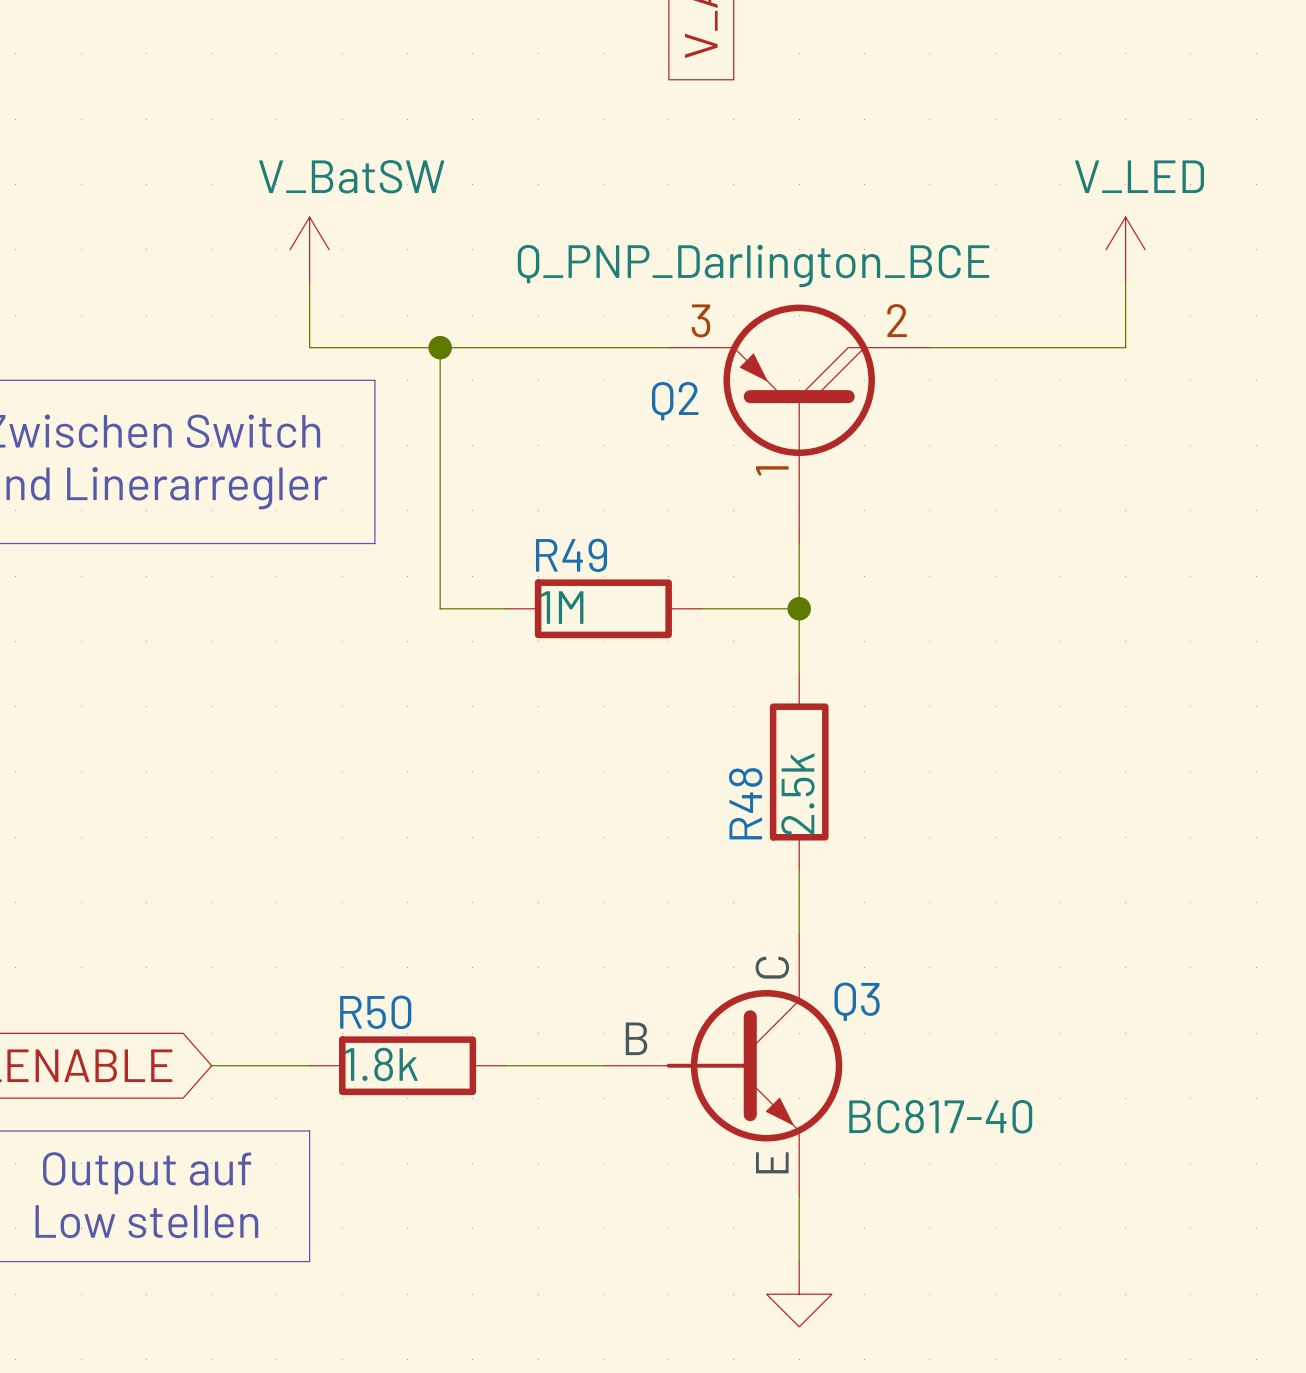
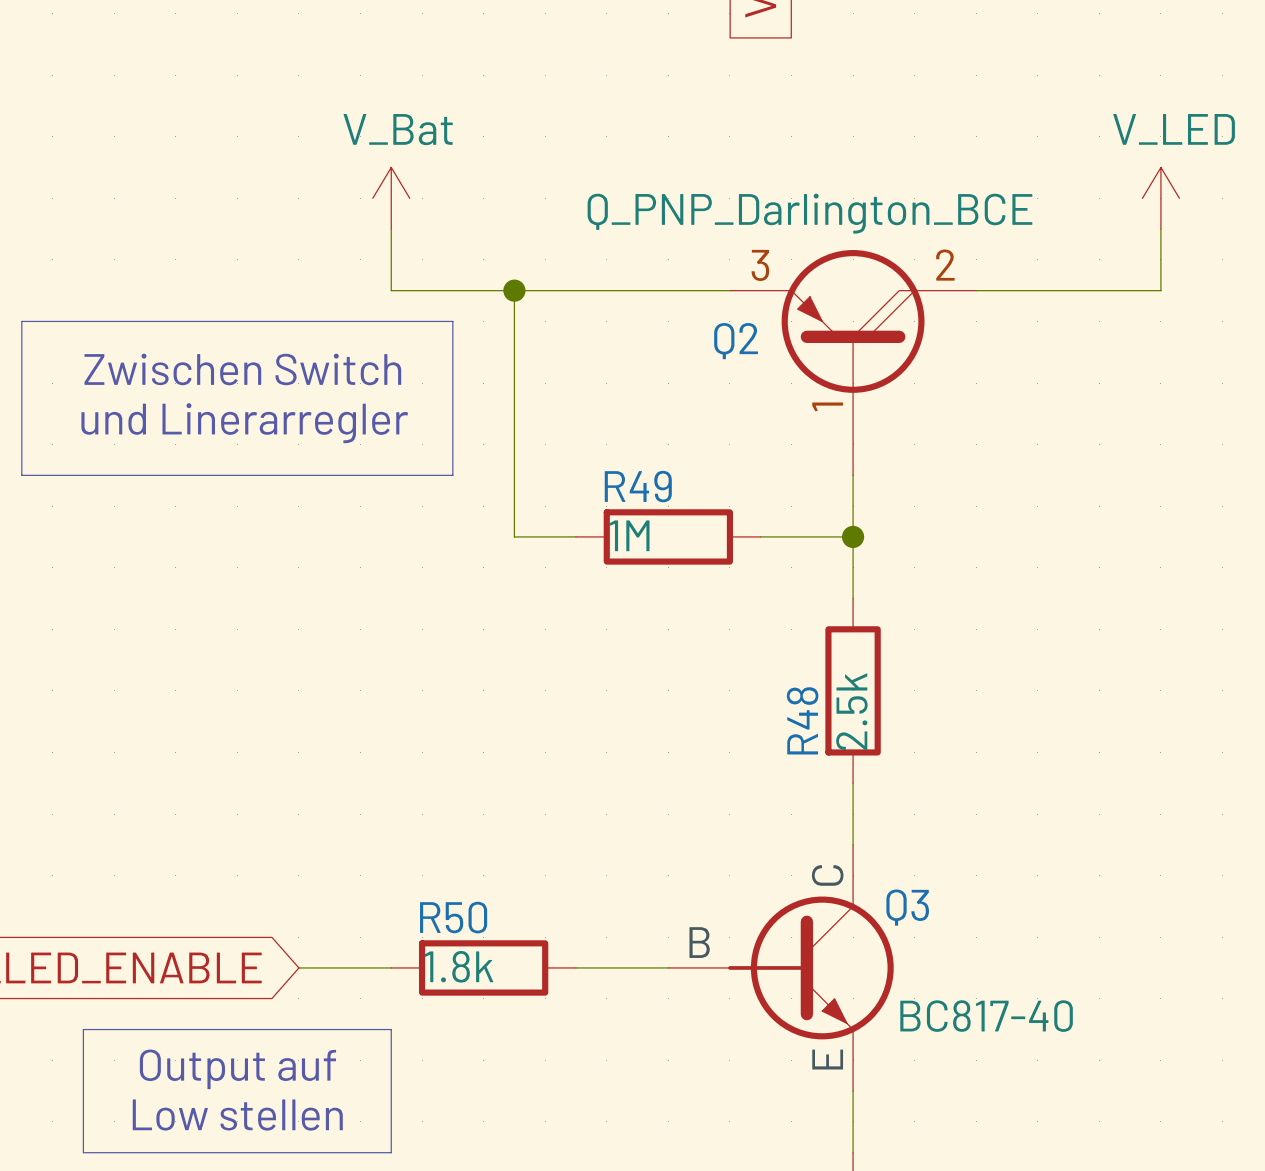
power symbol: V_BatSW (309, 249) -> V_Bat (391, 198)

